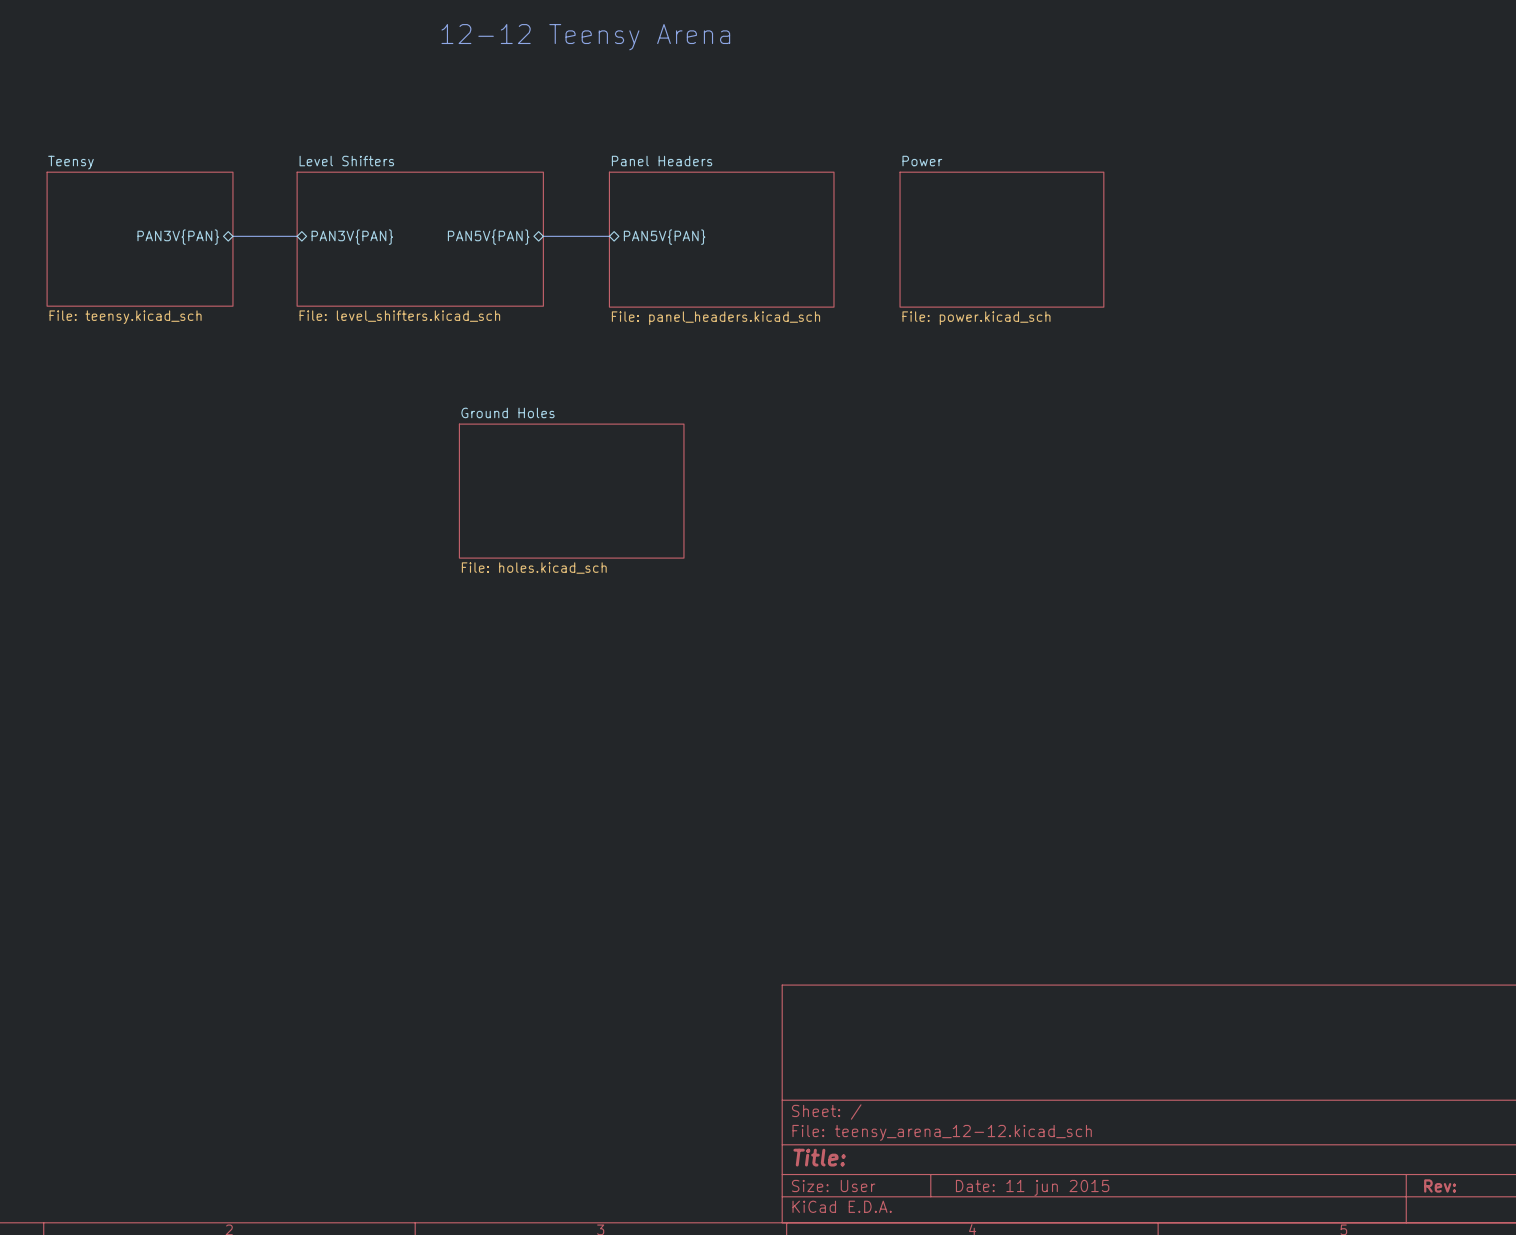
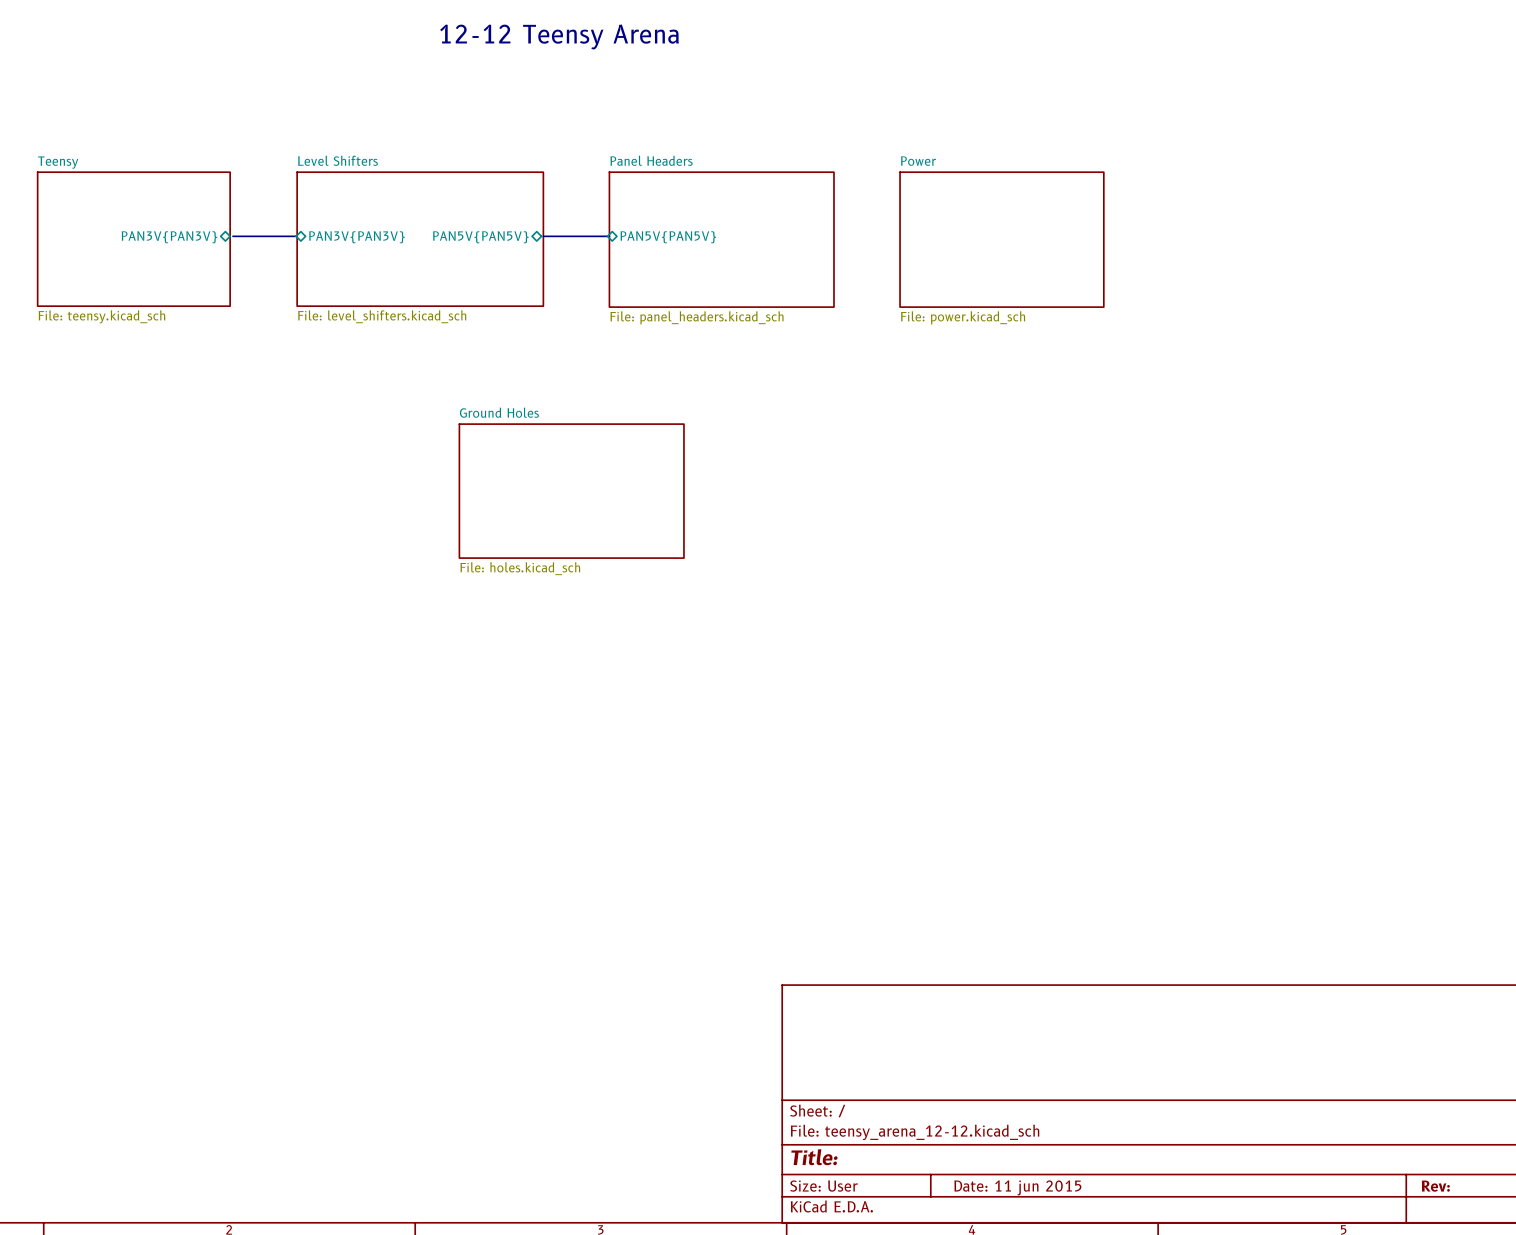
sheet Teensy shape: [46, 171, 234, 307] -> [37, 171, 231, 307]
sheet pin: PAN3V{PAN} (178, 237) -> PAN3V{PAN3V} (169, 237)
sheet pin: PAN3V{PAN} (352, 237) -> PAN3V{PAN3V} (356, 237)
sheet pin: PAN5V{PAN} (488, 237) -> PAN5V{PAN5V} (480, 237)
sheet pin: PAN5V{PAN} (664, 237) -> PAN5V{PAN5V} (668, 237)

